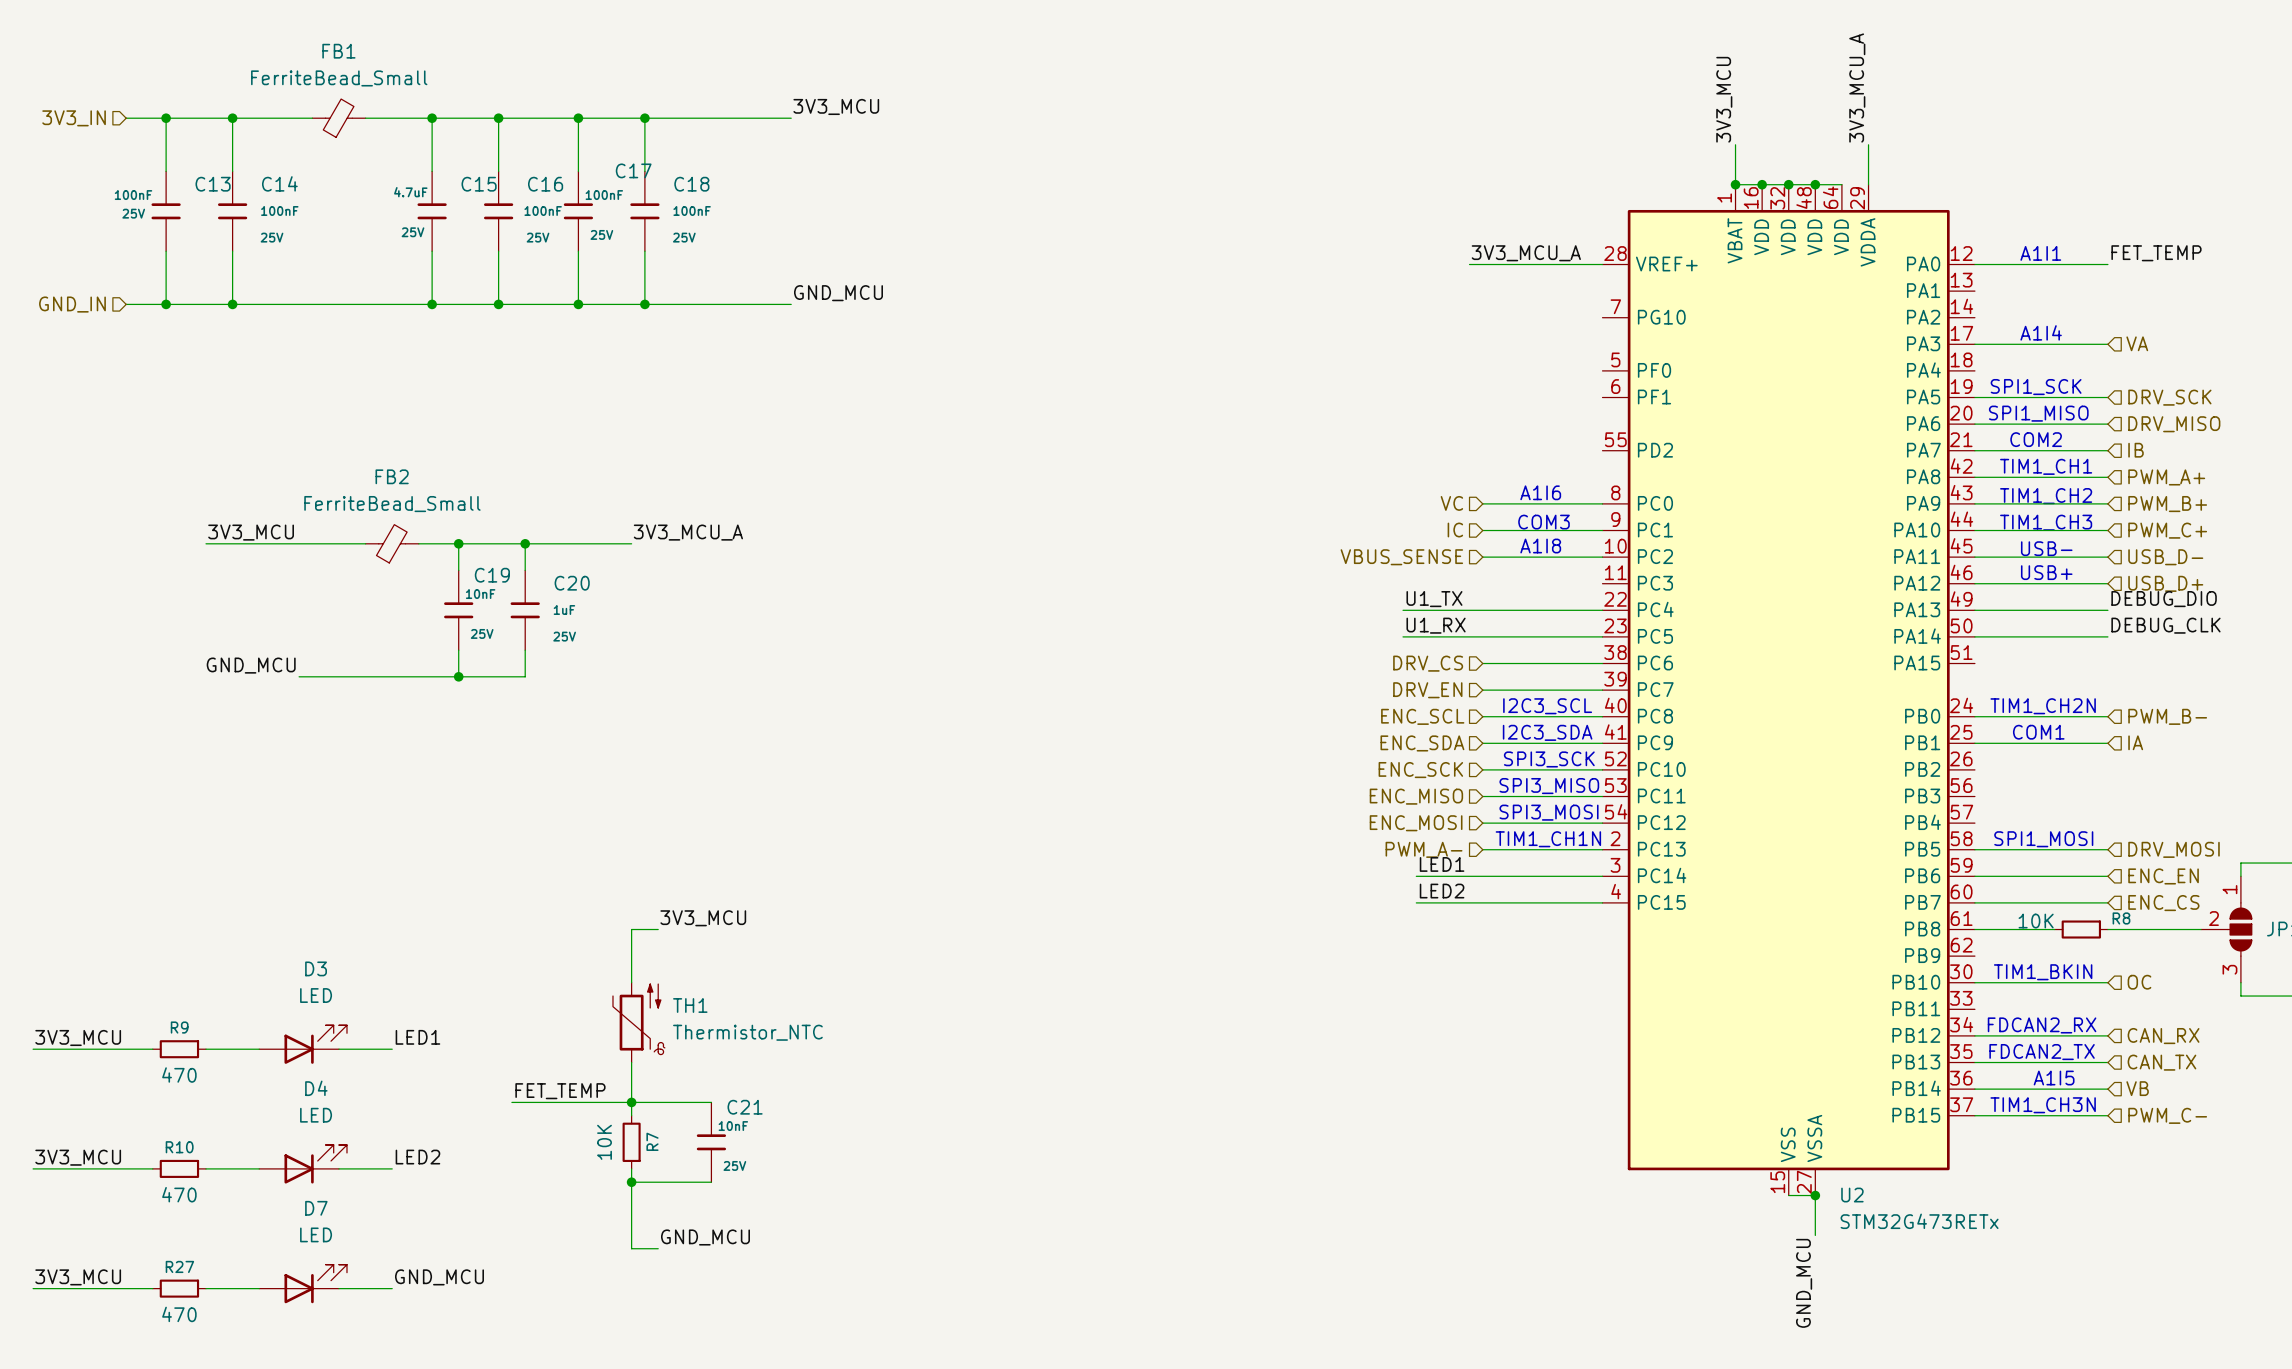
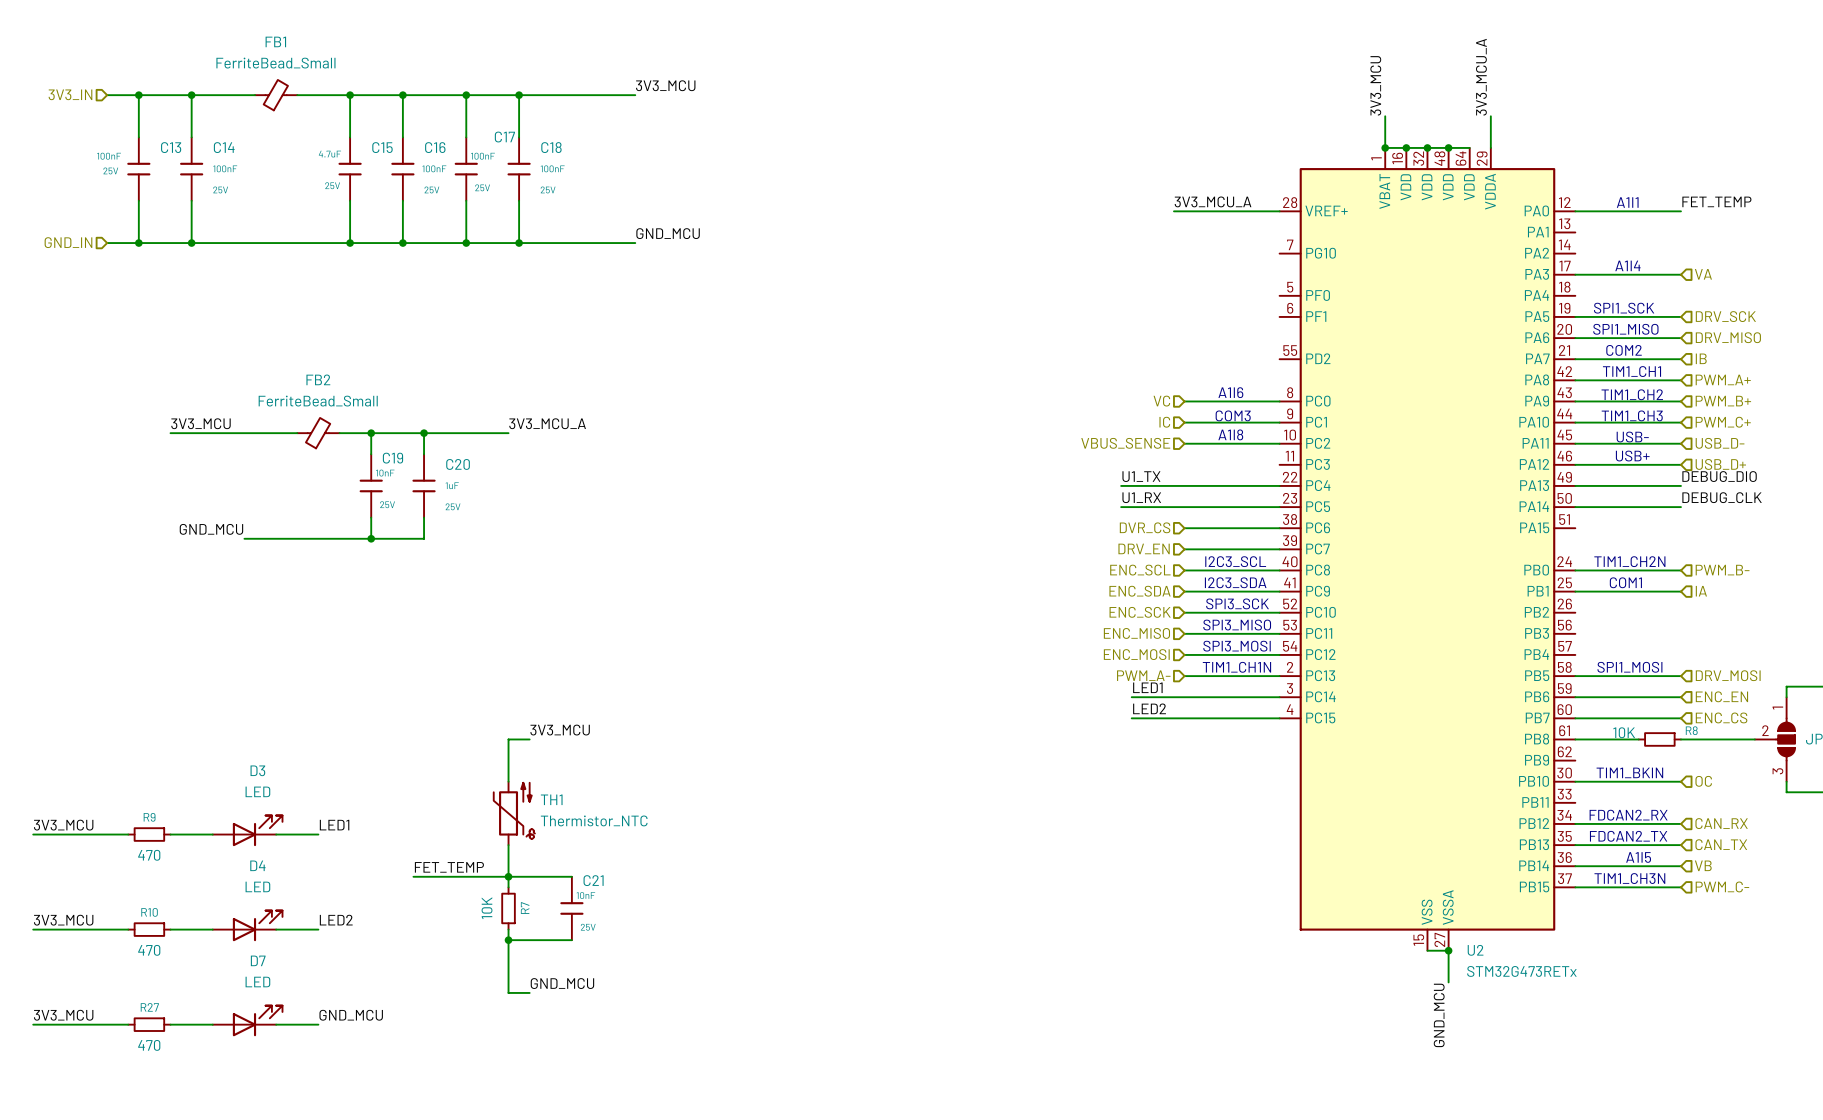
hierarchical label: DRV_CS (1428, 663) -> DVR_CS (1145, 527)

